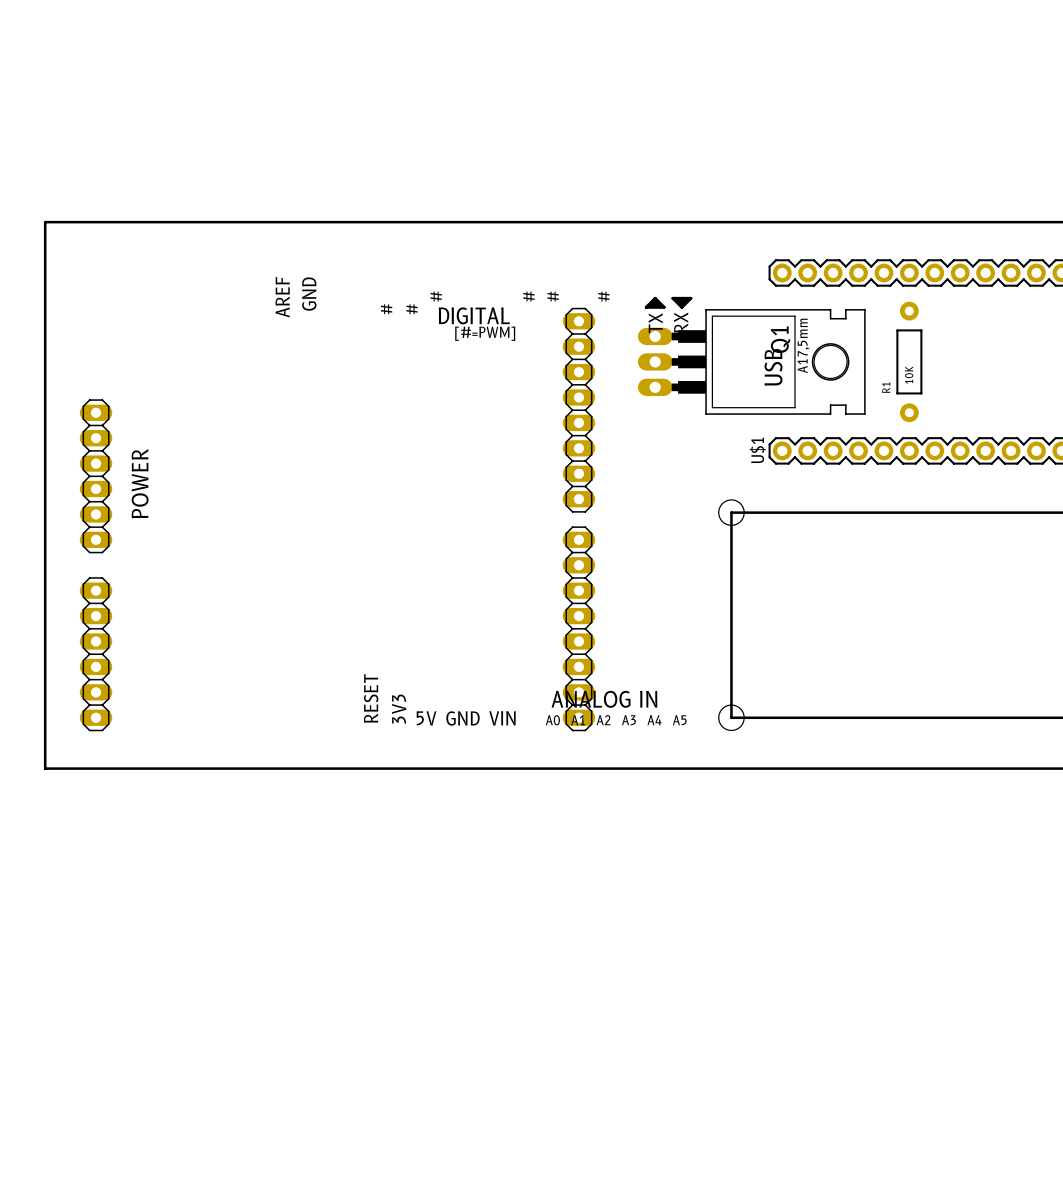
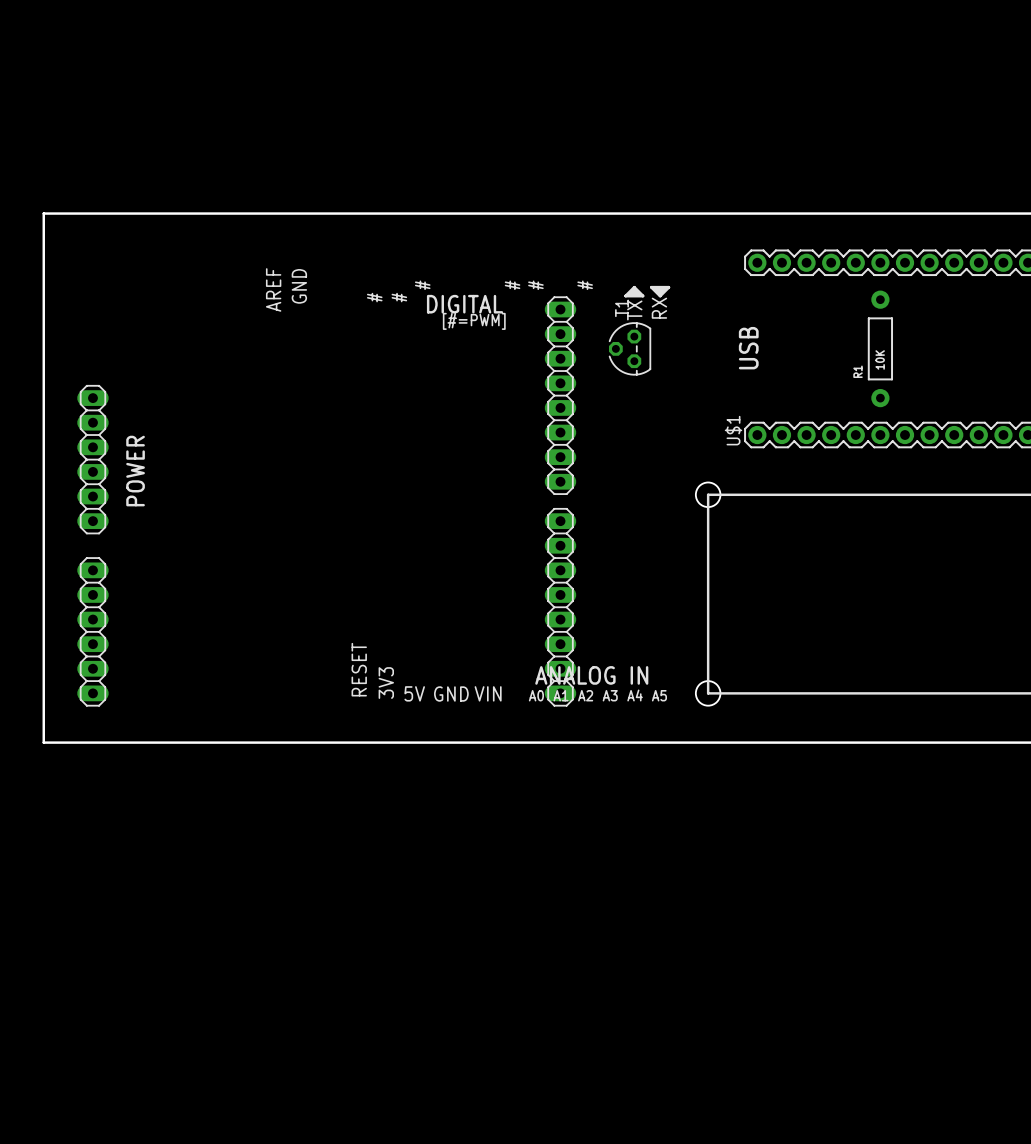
T1: none -> (629, 348)
Q1: (751, 361) -> none

